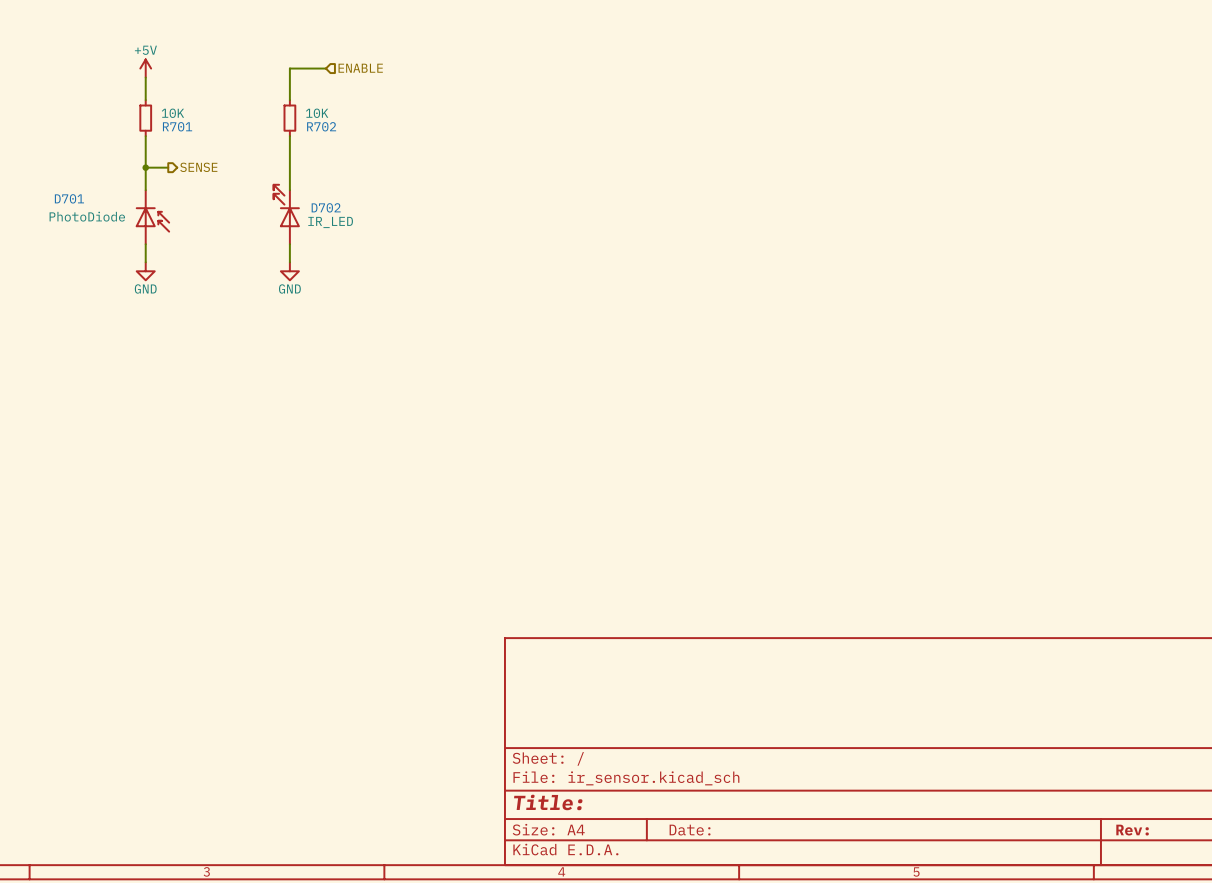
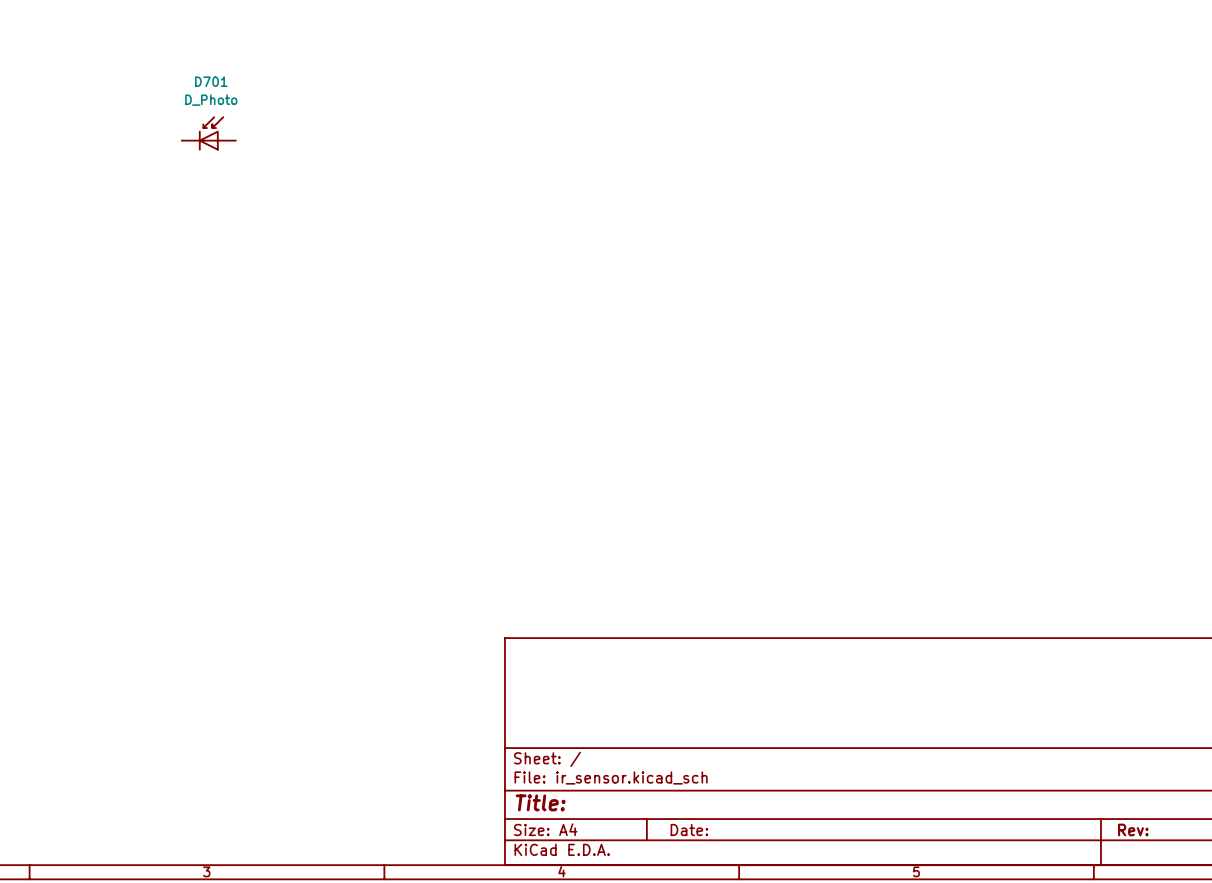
power symbol: +5V (145, 68) -> none
wire: (325, 68) (289, 68) (289, 100) -> none
hierarchical label: ENABLE (360, 68) -> none
wire: (145, 77) (145, 100) -> none
R701: 10K (145, 118) -> none
R702: 10K (289, 118) -> none
wire: (145, 136) (145, 190) -> none
wire: (289, 136) (289, 190) -> none
wire: (145, 167) (168, 167) -> none
junction: (145, 167) -> none
hierarchical label: SENSE (198, 167) -> none
D701 name position: D701 (69, 198) -> D701 (211, 81)
D702: IR_LED (286, 214) -> none
D701 value: PhotoDiode (87, 216) -> D_Photo (211, 100)
D701 position: (152, 217) -> (208, 133)
D701 rotation: 0° (152, 219) -> 90° counterclockwise (211, 133)
wire: (145, 244) (145, 262) -> none
wire: (289, 244) (289, 262) -> none
power symbol: GND (145, 271) -> none
power symbol: GND (289, 271) -> none

